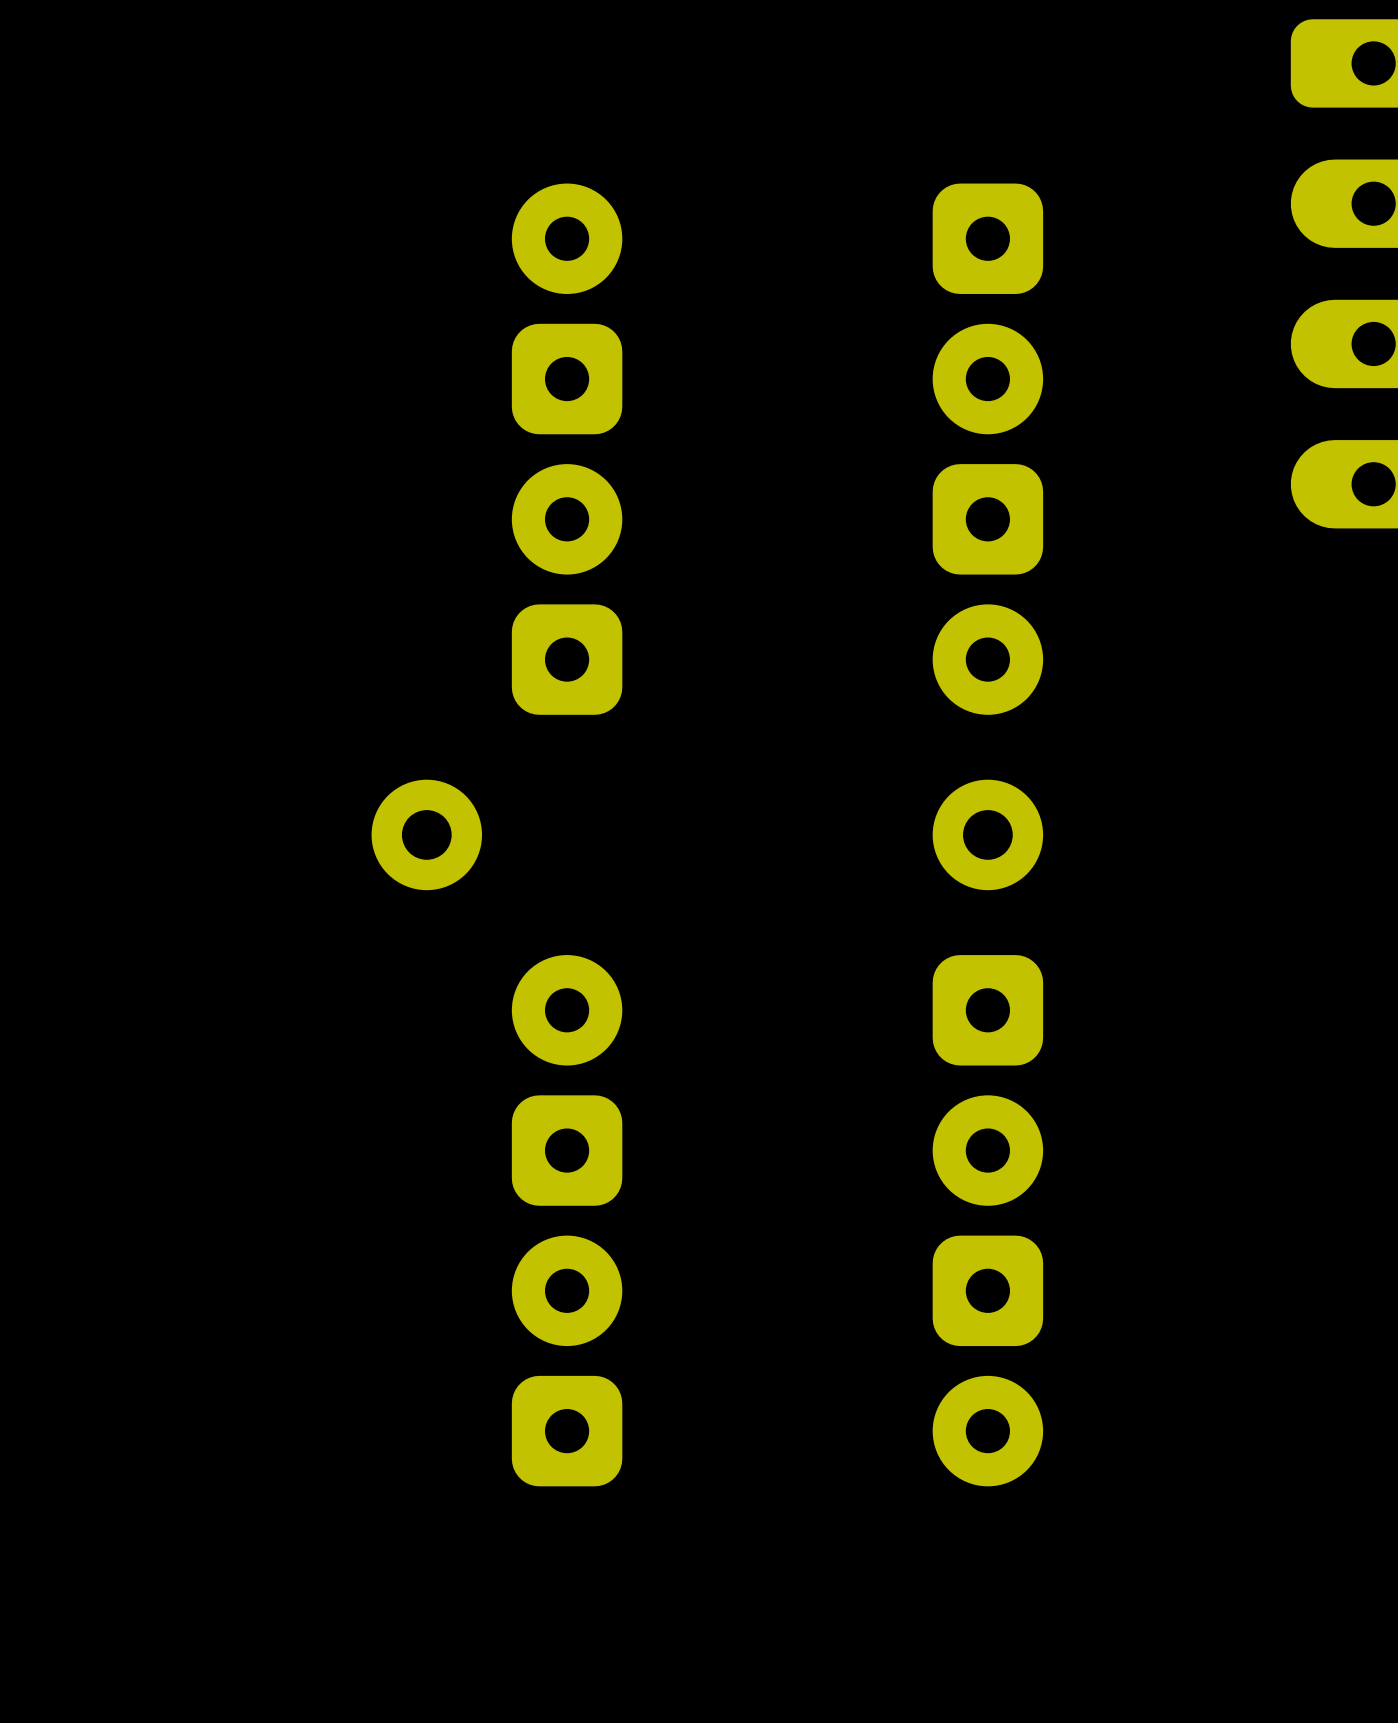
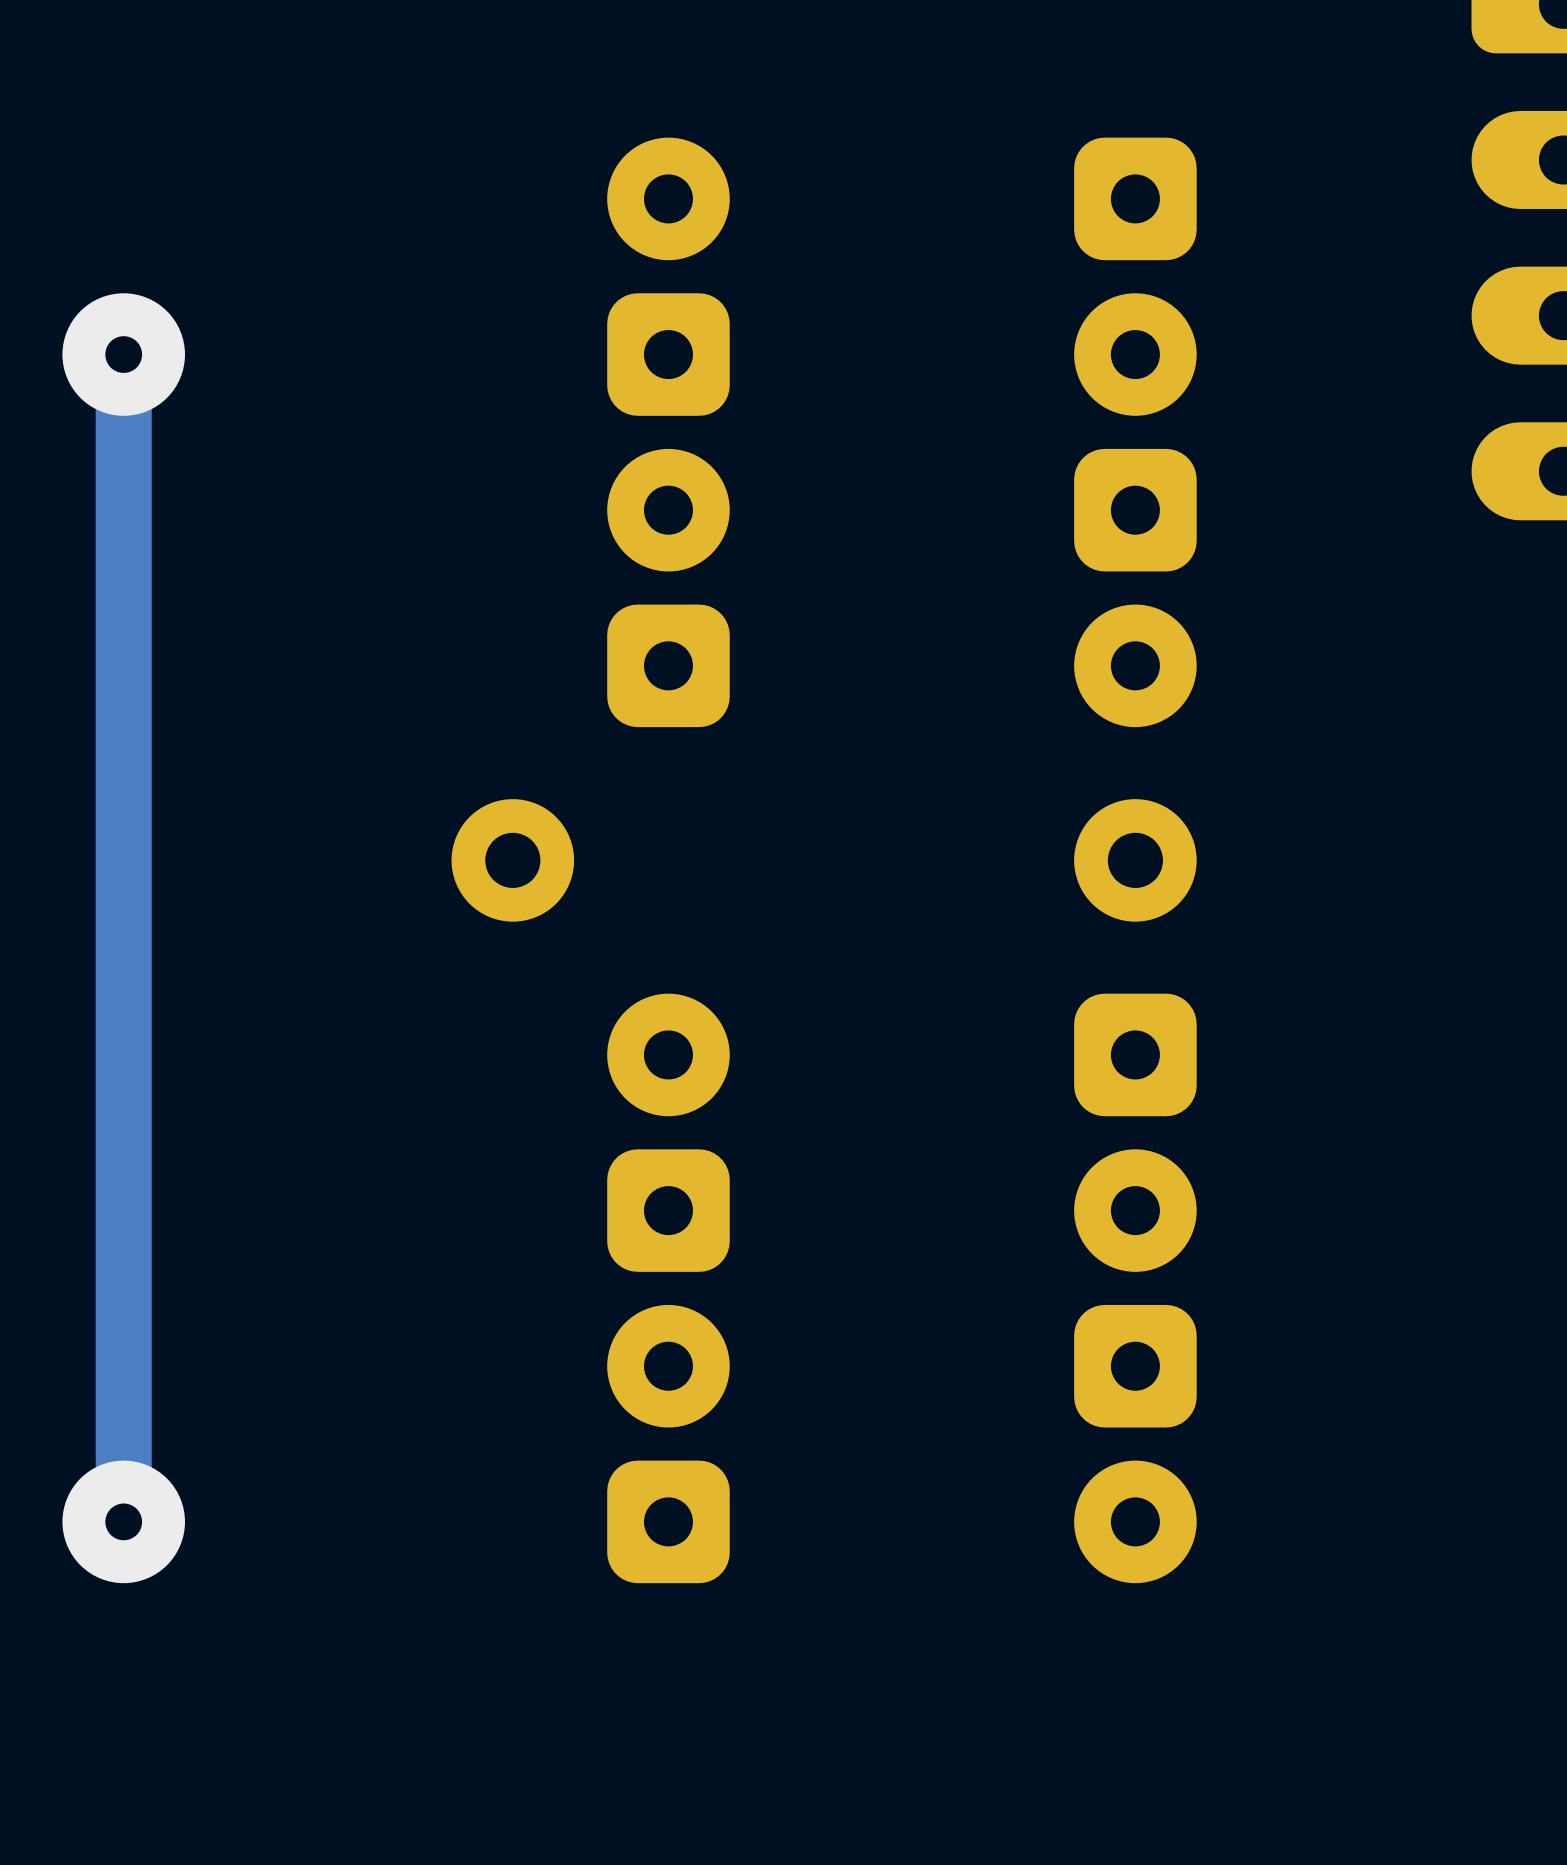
track: none -> (123, 354) (123, 1521)
via: none -> (123, 354)
via: none -> (123, 1521)

